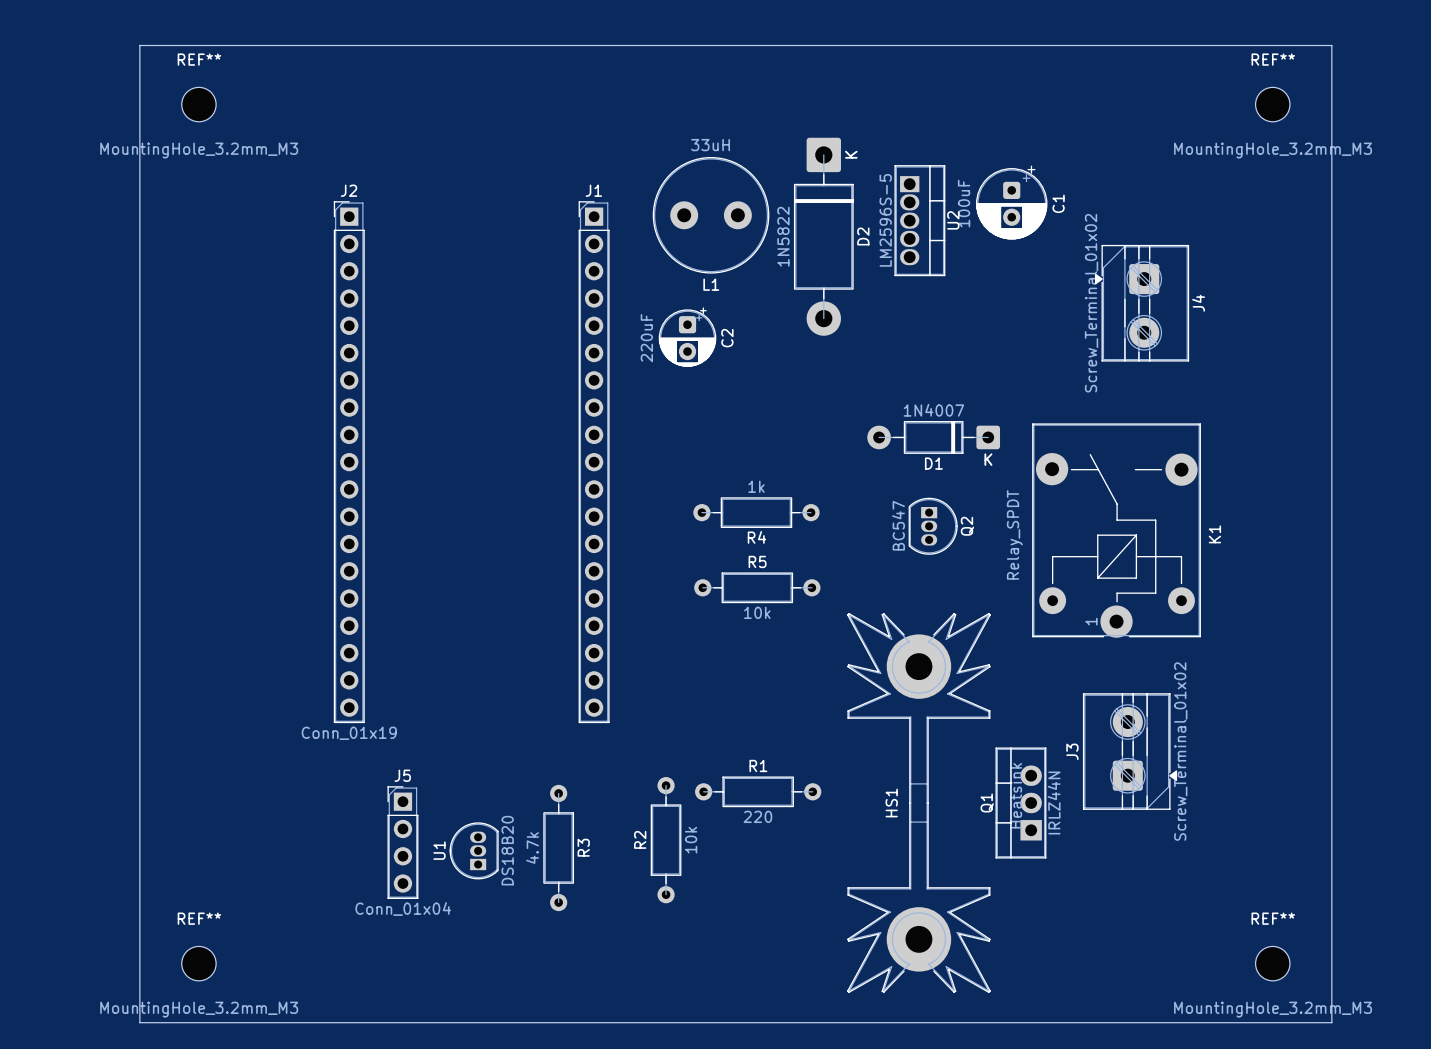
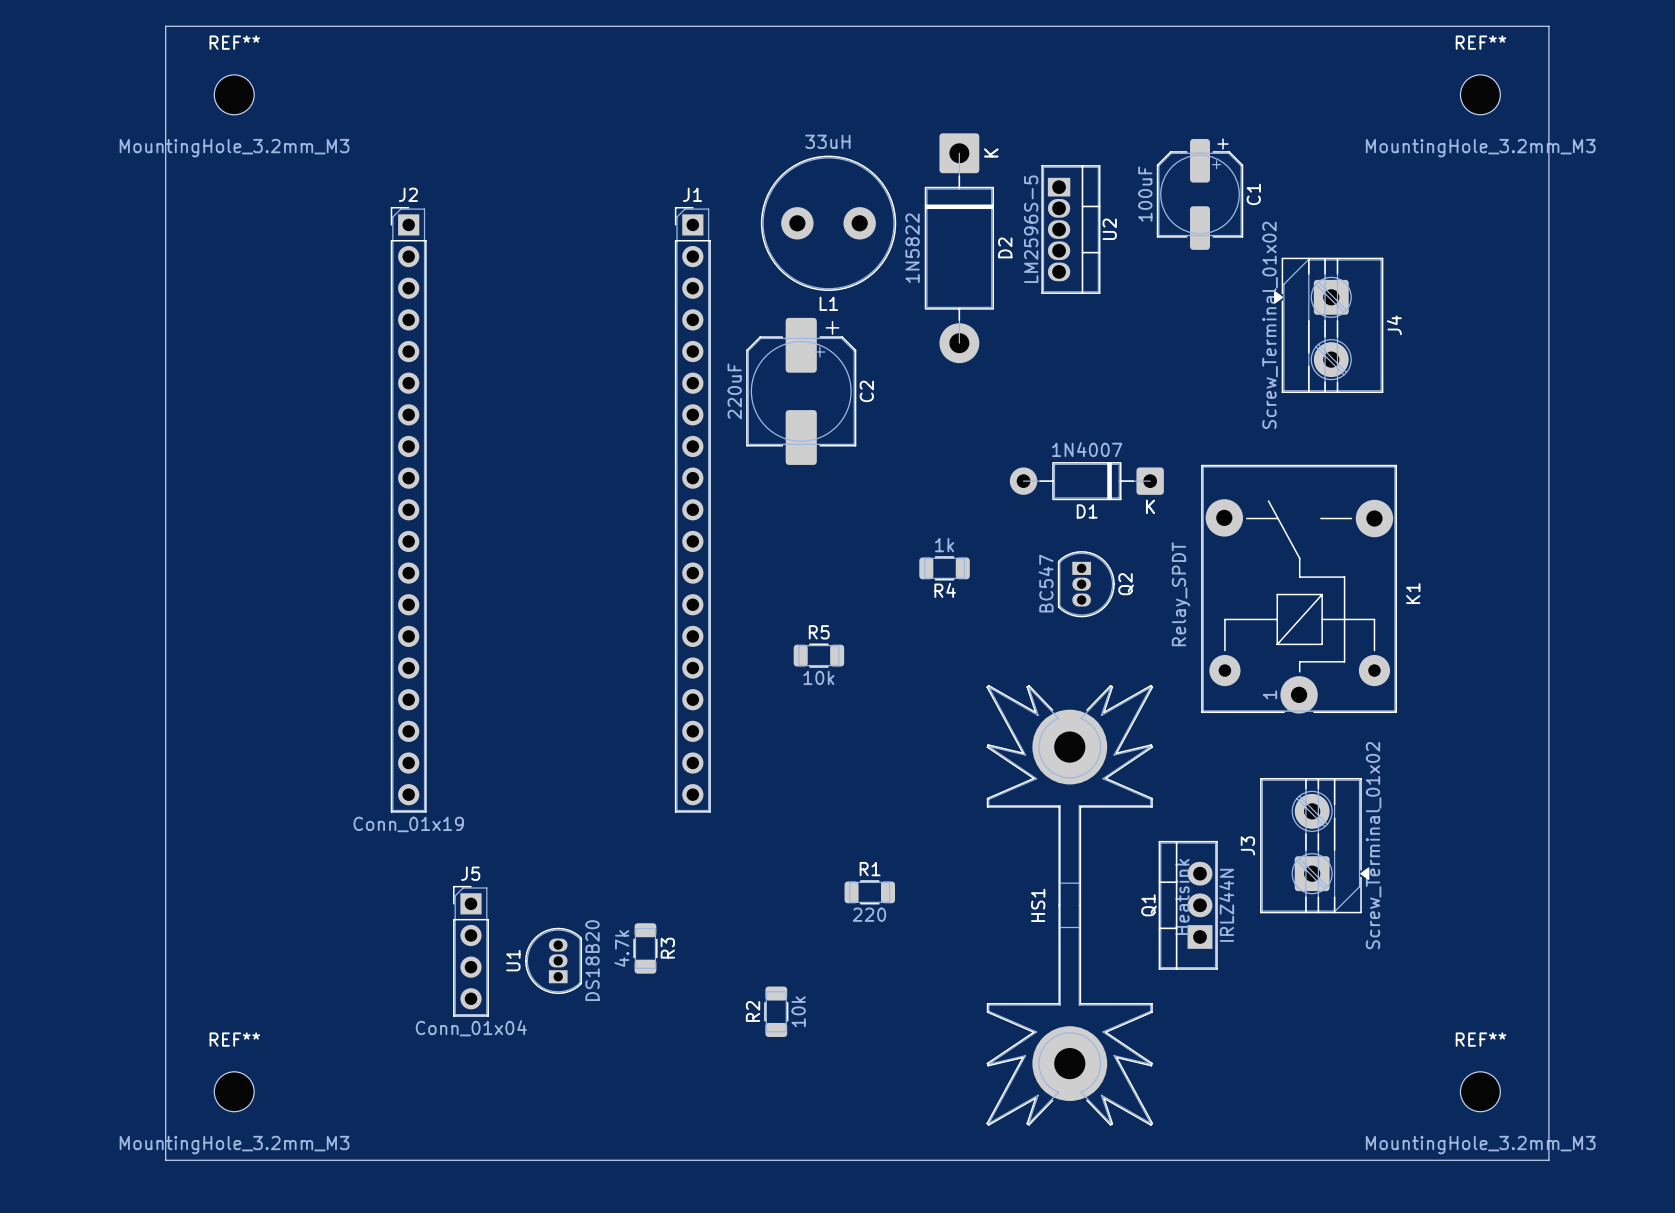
C1 footprint: [975, 165, 1048, 240] -> [1156, 138, 1244, 250]
C2 footprint: [658, 307, 717, 367] -> [746, 317, 857, 465]
R4 footprint: [693, 497, 820, 528] -> [919, 556, 970, 581]
R5 footprint: [694, 572, 821, 604] -> [793, 643, 845, 668]
R1 footprint: [695, 776, 822, 808] -> [844, 880, 896, 905]
R2 footprint: [650, 777, 682, 904] -> [764, 986, 789, 1037]
R3 footprint: [543, 784, 575, 912] -> [633, 923, 658, 974]

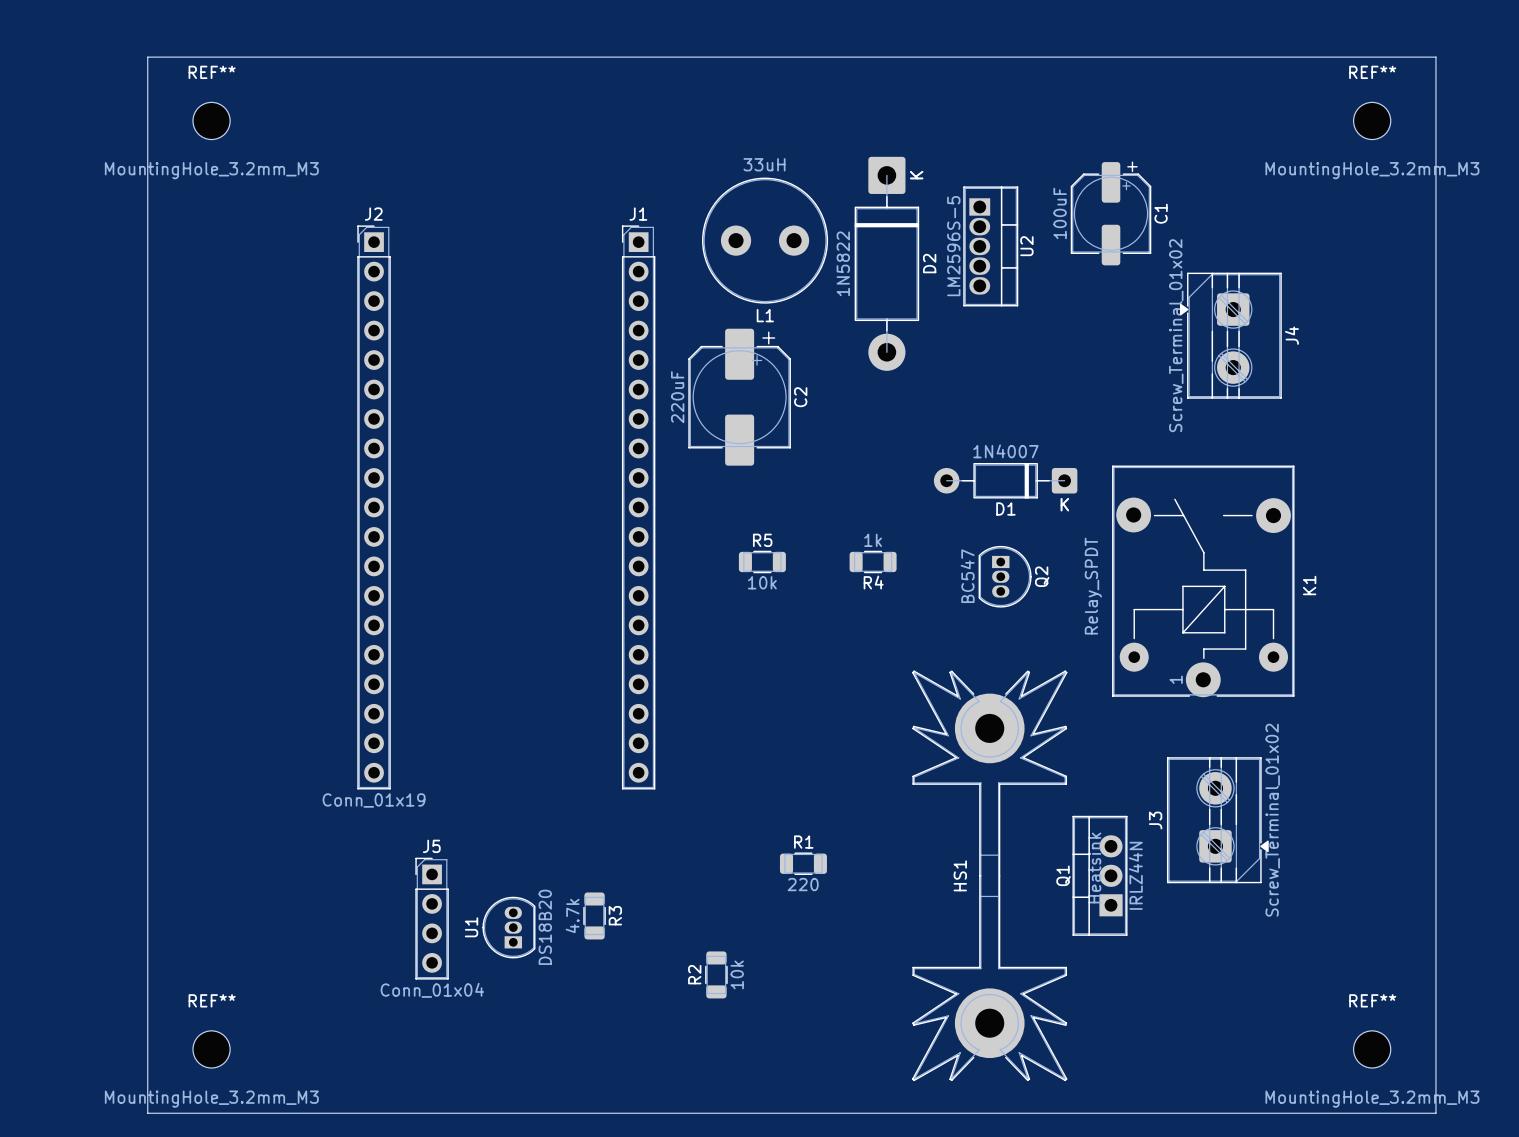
R5 position: (818, 655) -> (762, 561)

